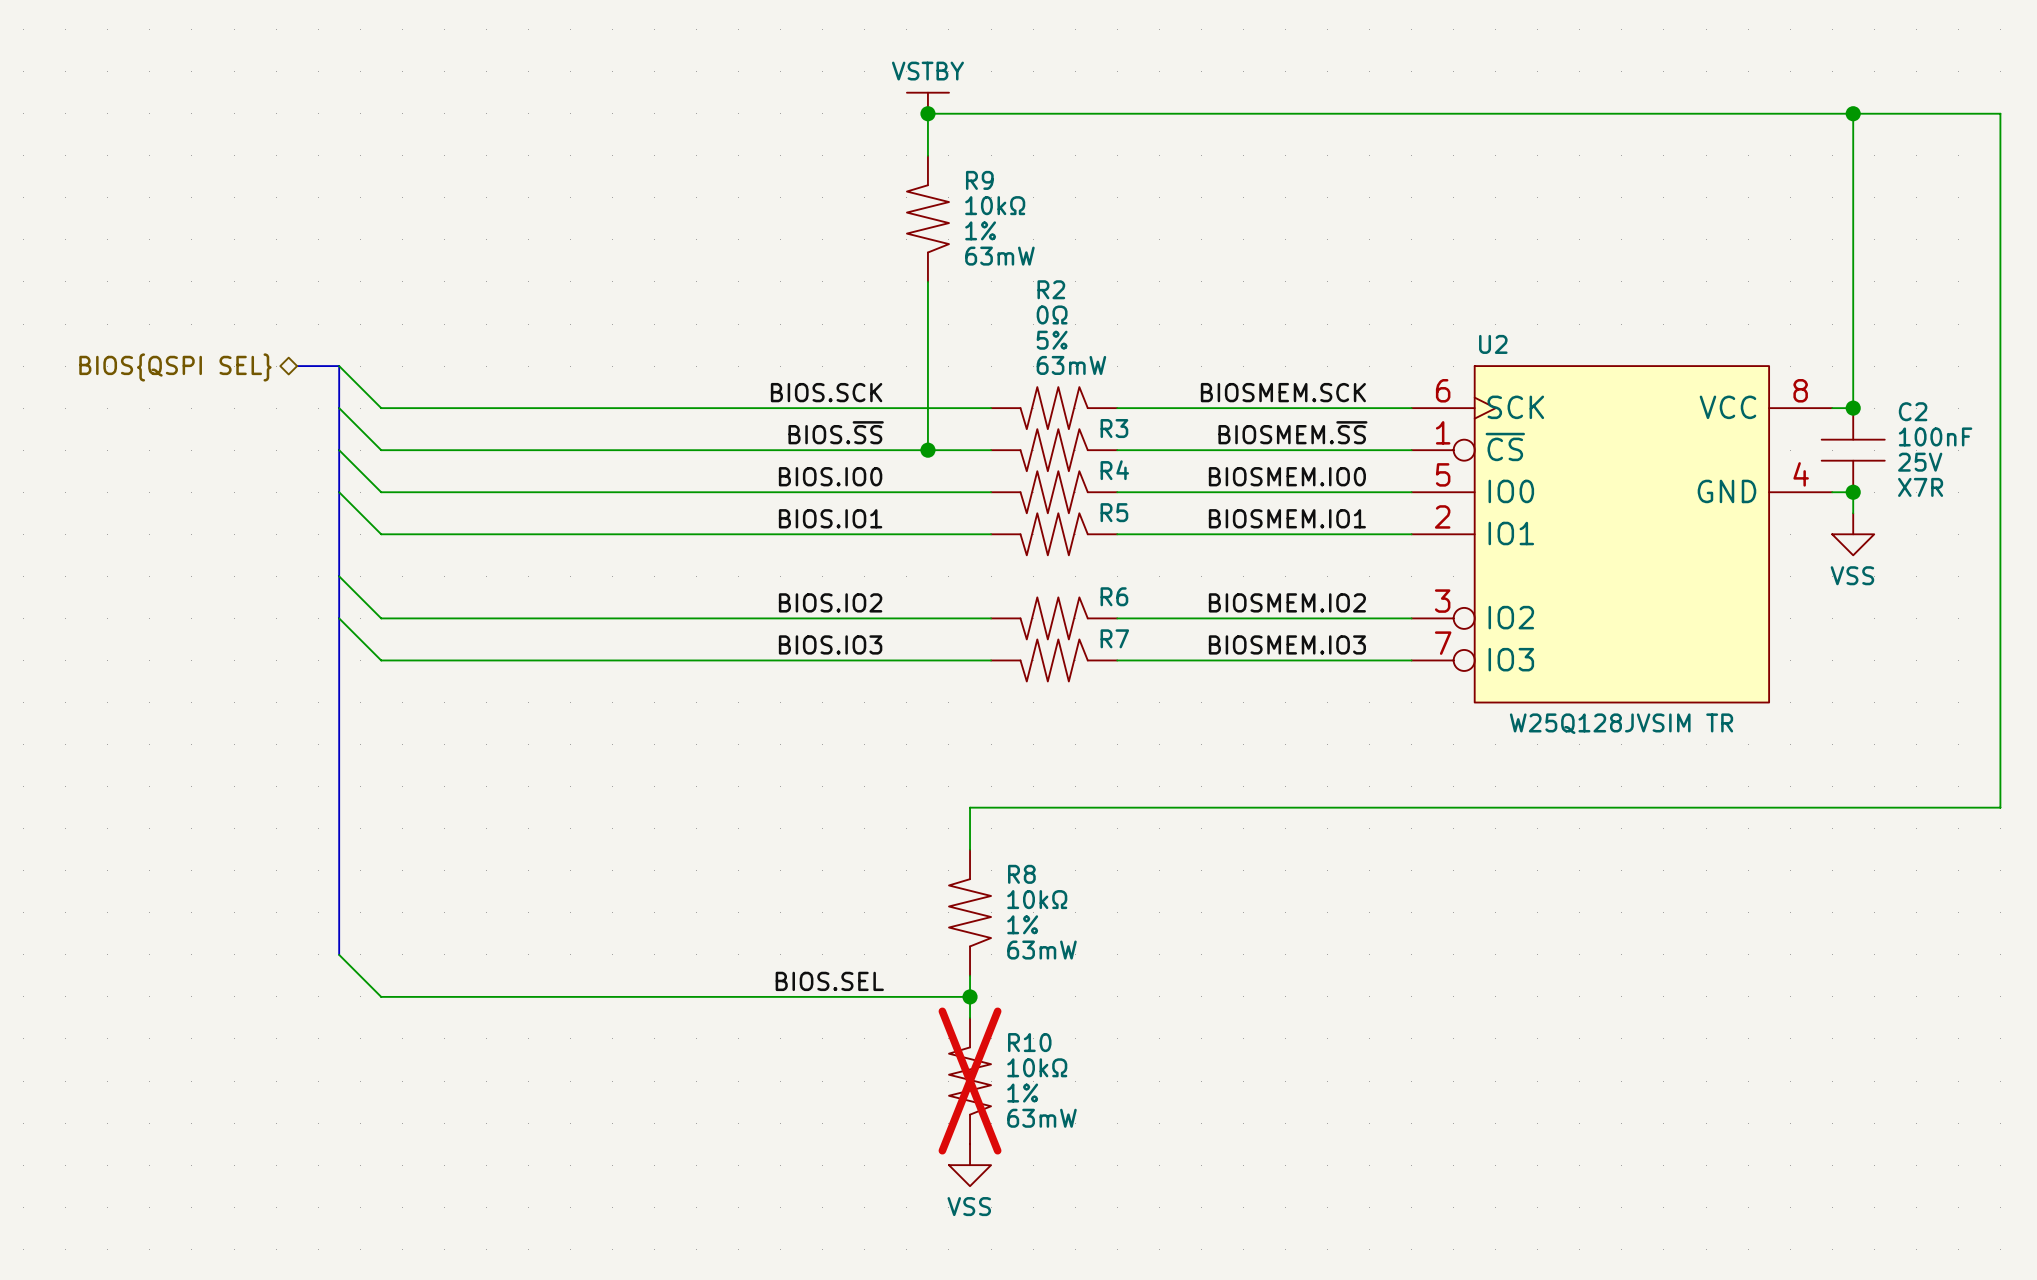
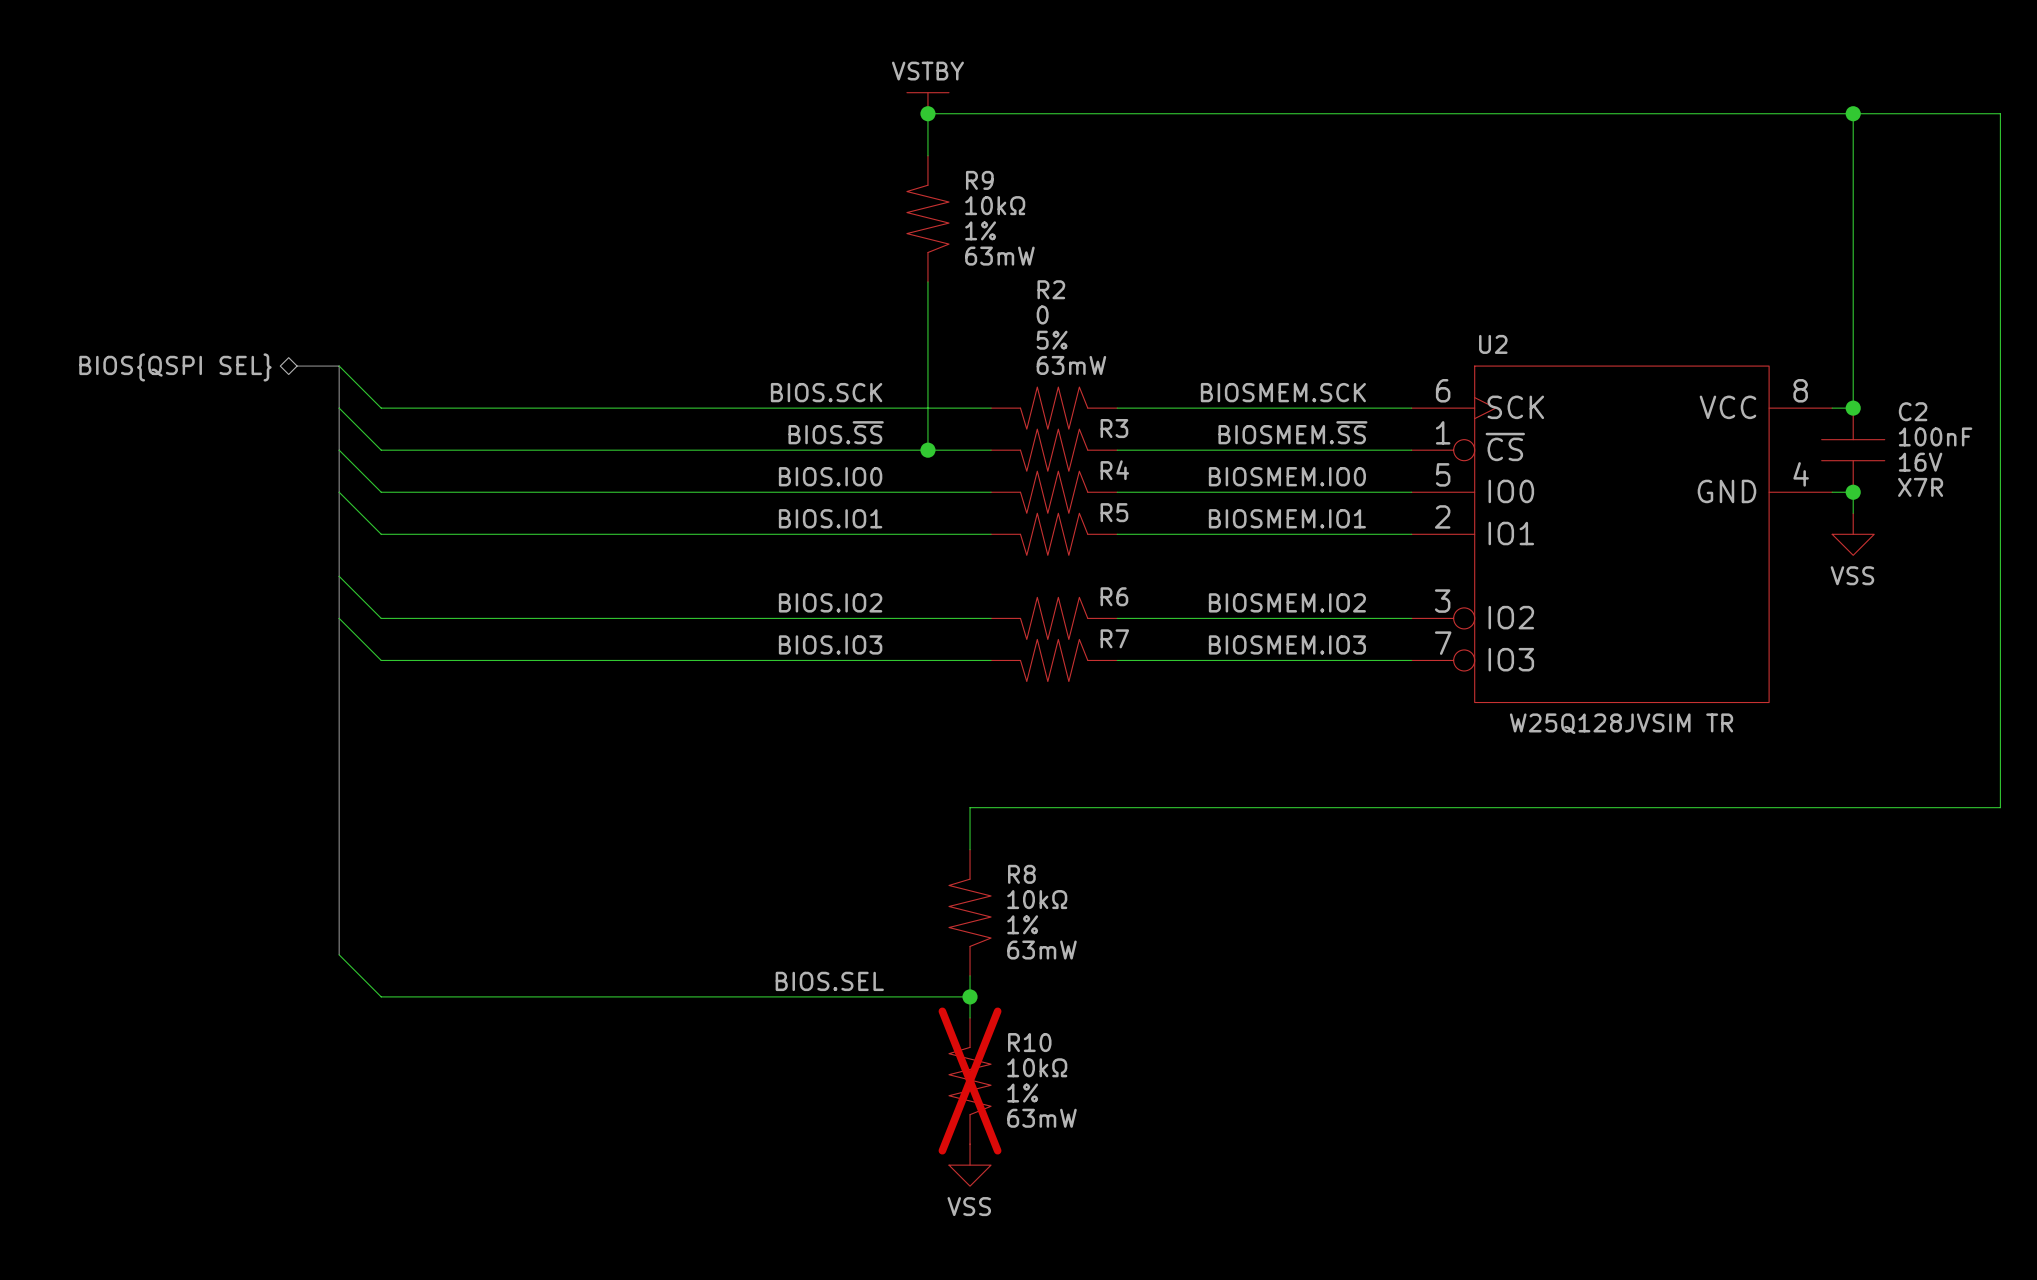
R2 text: 0Ω (1052, 314) -> 0 (1042, 314)
C2 text: 25V (1920, 462) -> 16V (1920, 462)

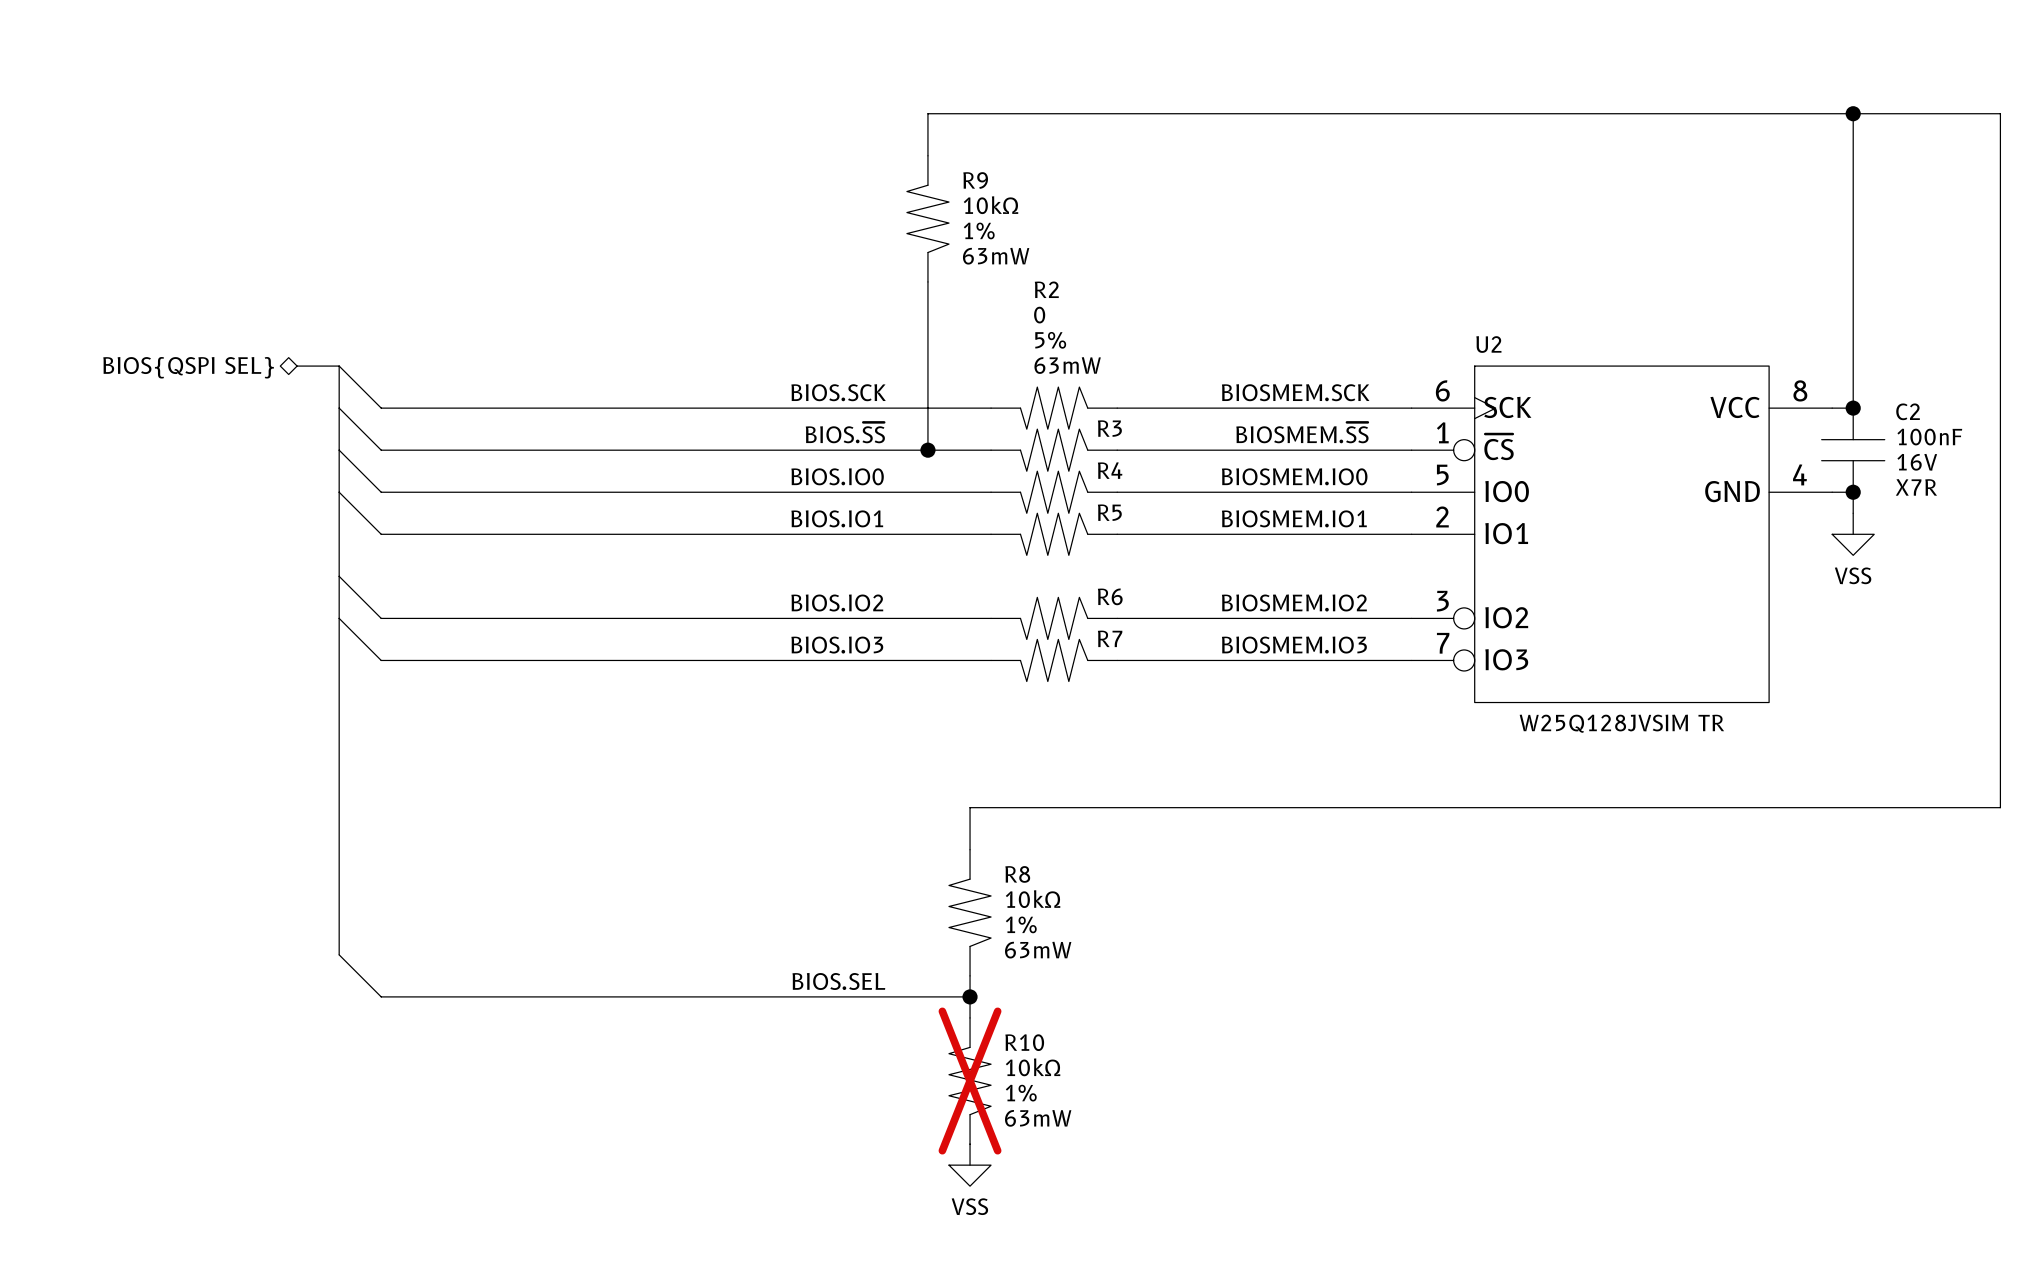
power symbol: VSTBY (927, 103) -> none
junction: (927, 113) -> none

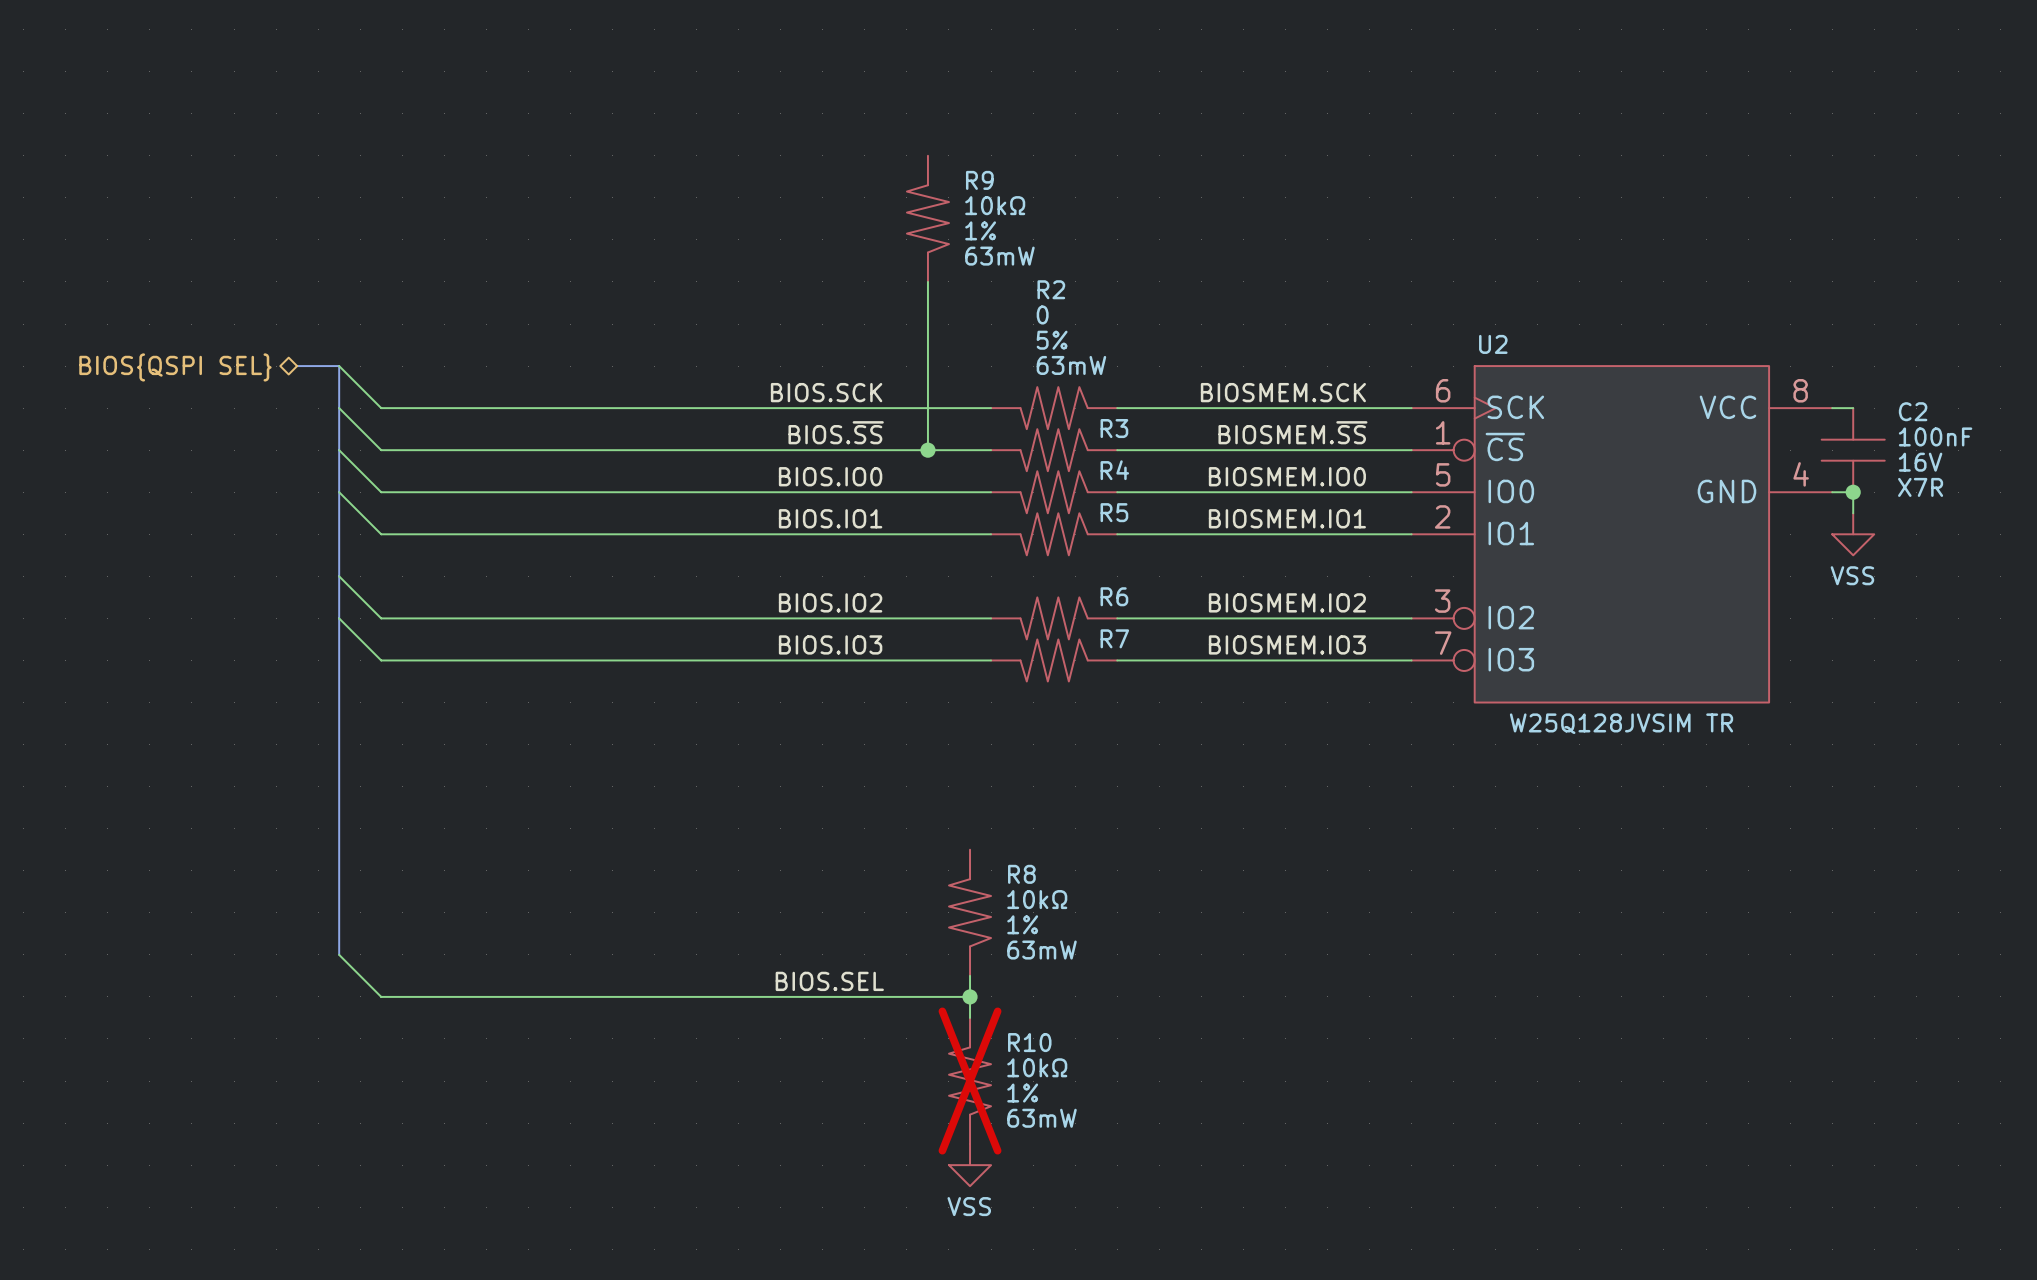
wire: (1853, 113) (1853, 408) -> none
junction: (1853, 113) -> none
wire: (927, 155) (927, 113) (2000, 113) (2000, 807) (970, 807) (970, 849) -> none
junction: (1853, 408) -> none

